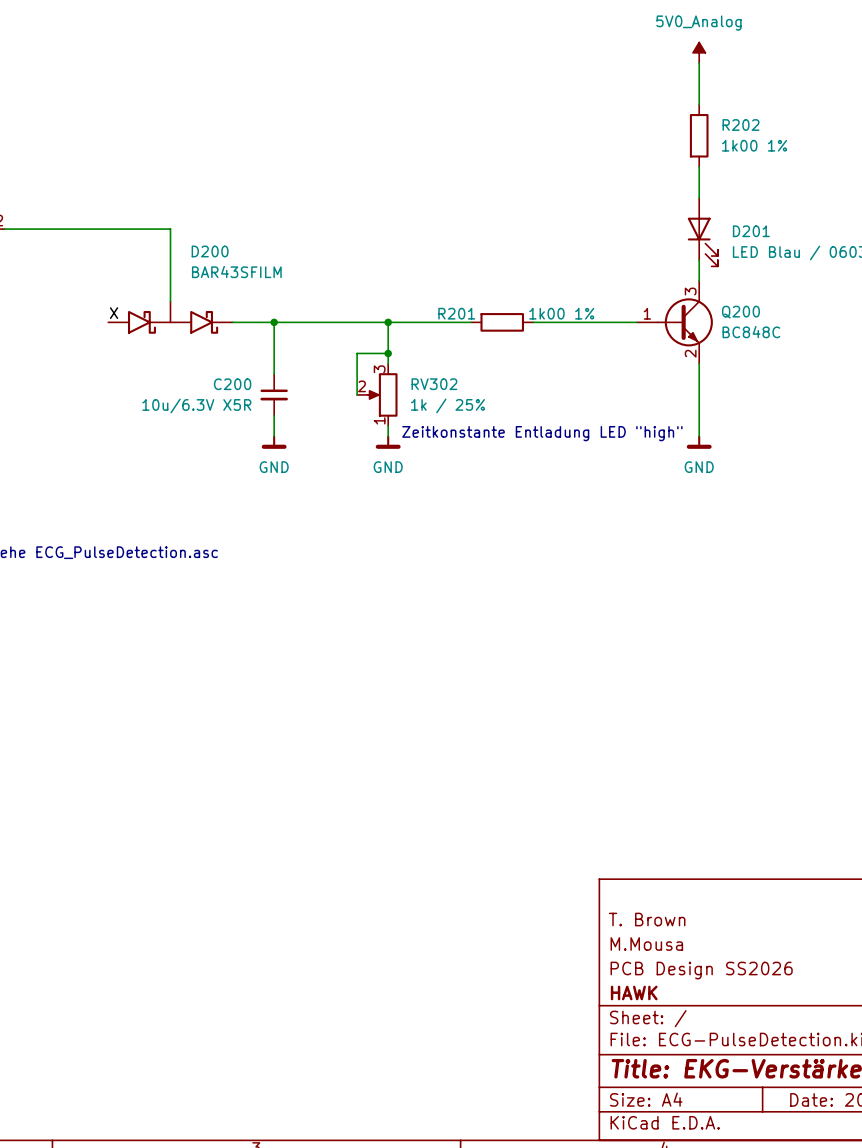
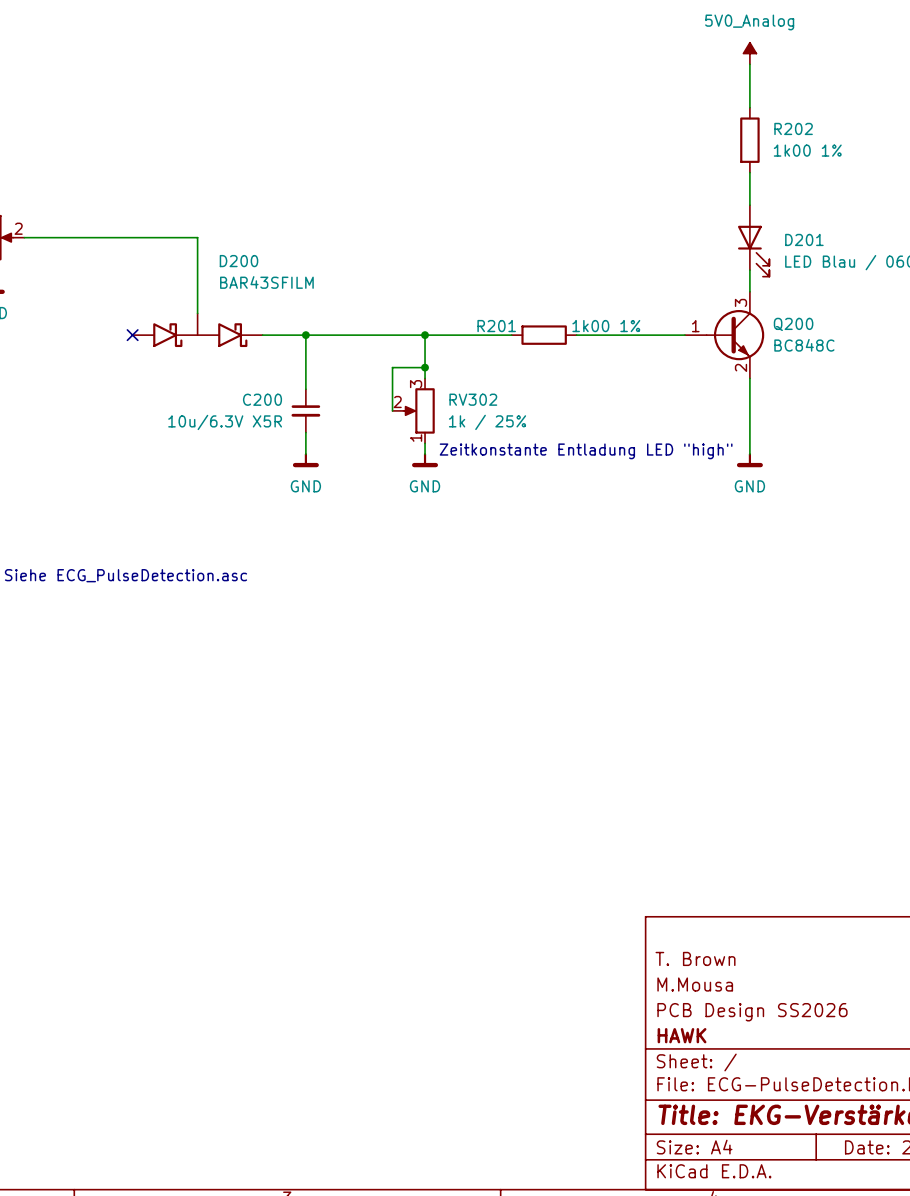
label: X (114, 313) -> none
no-connect mark: none -> (132, 335)

